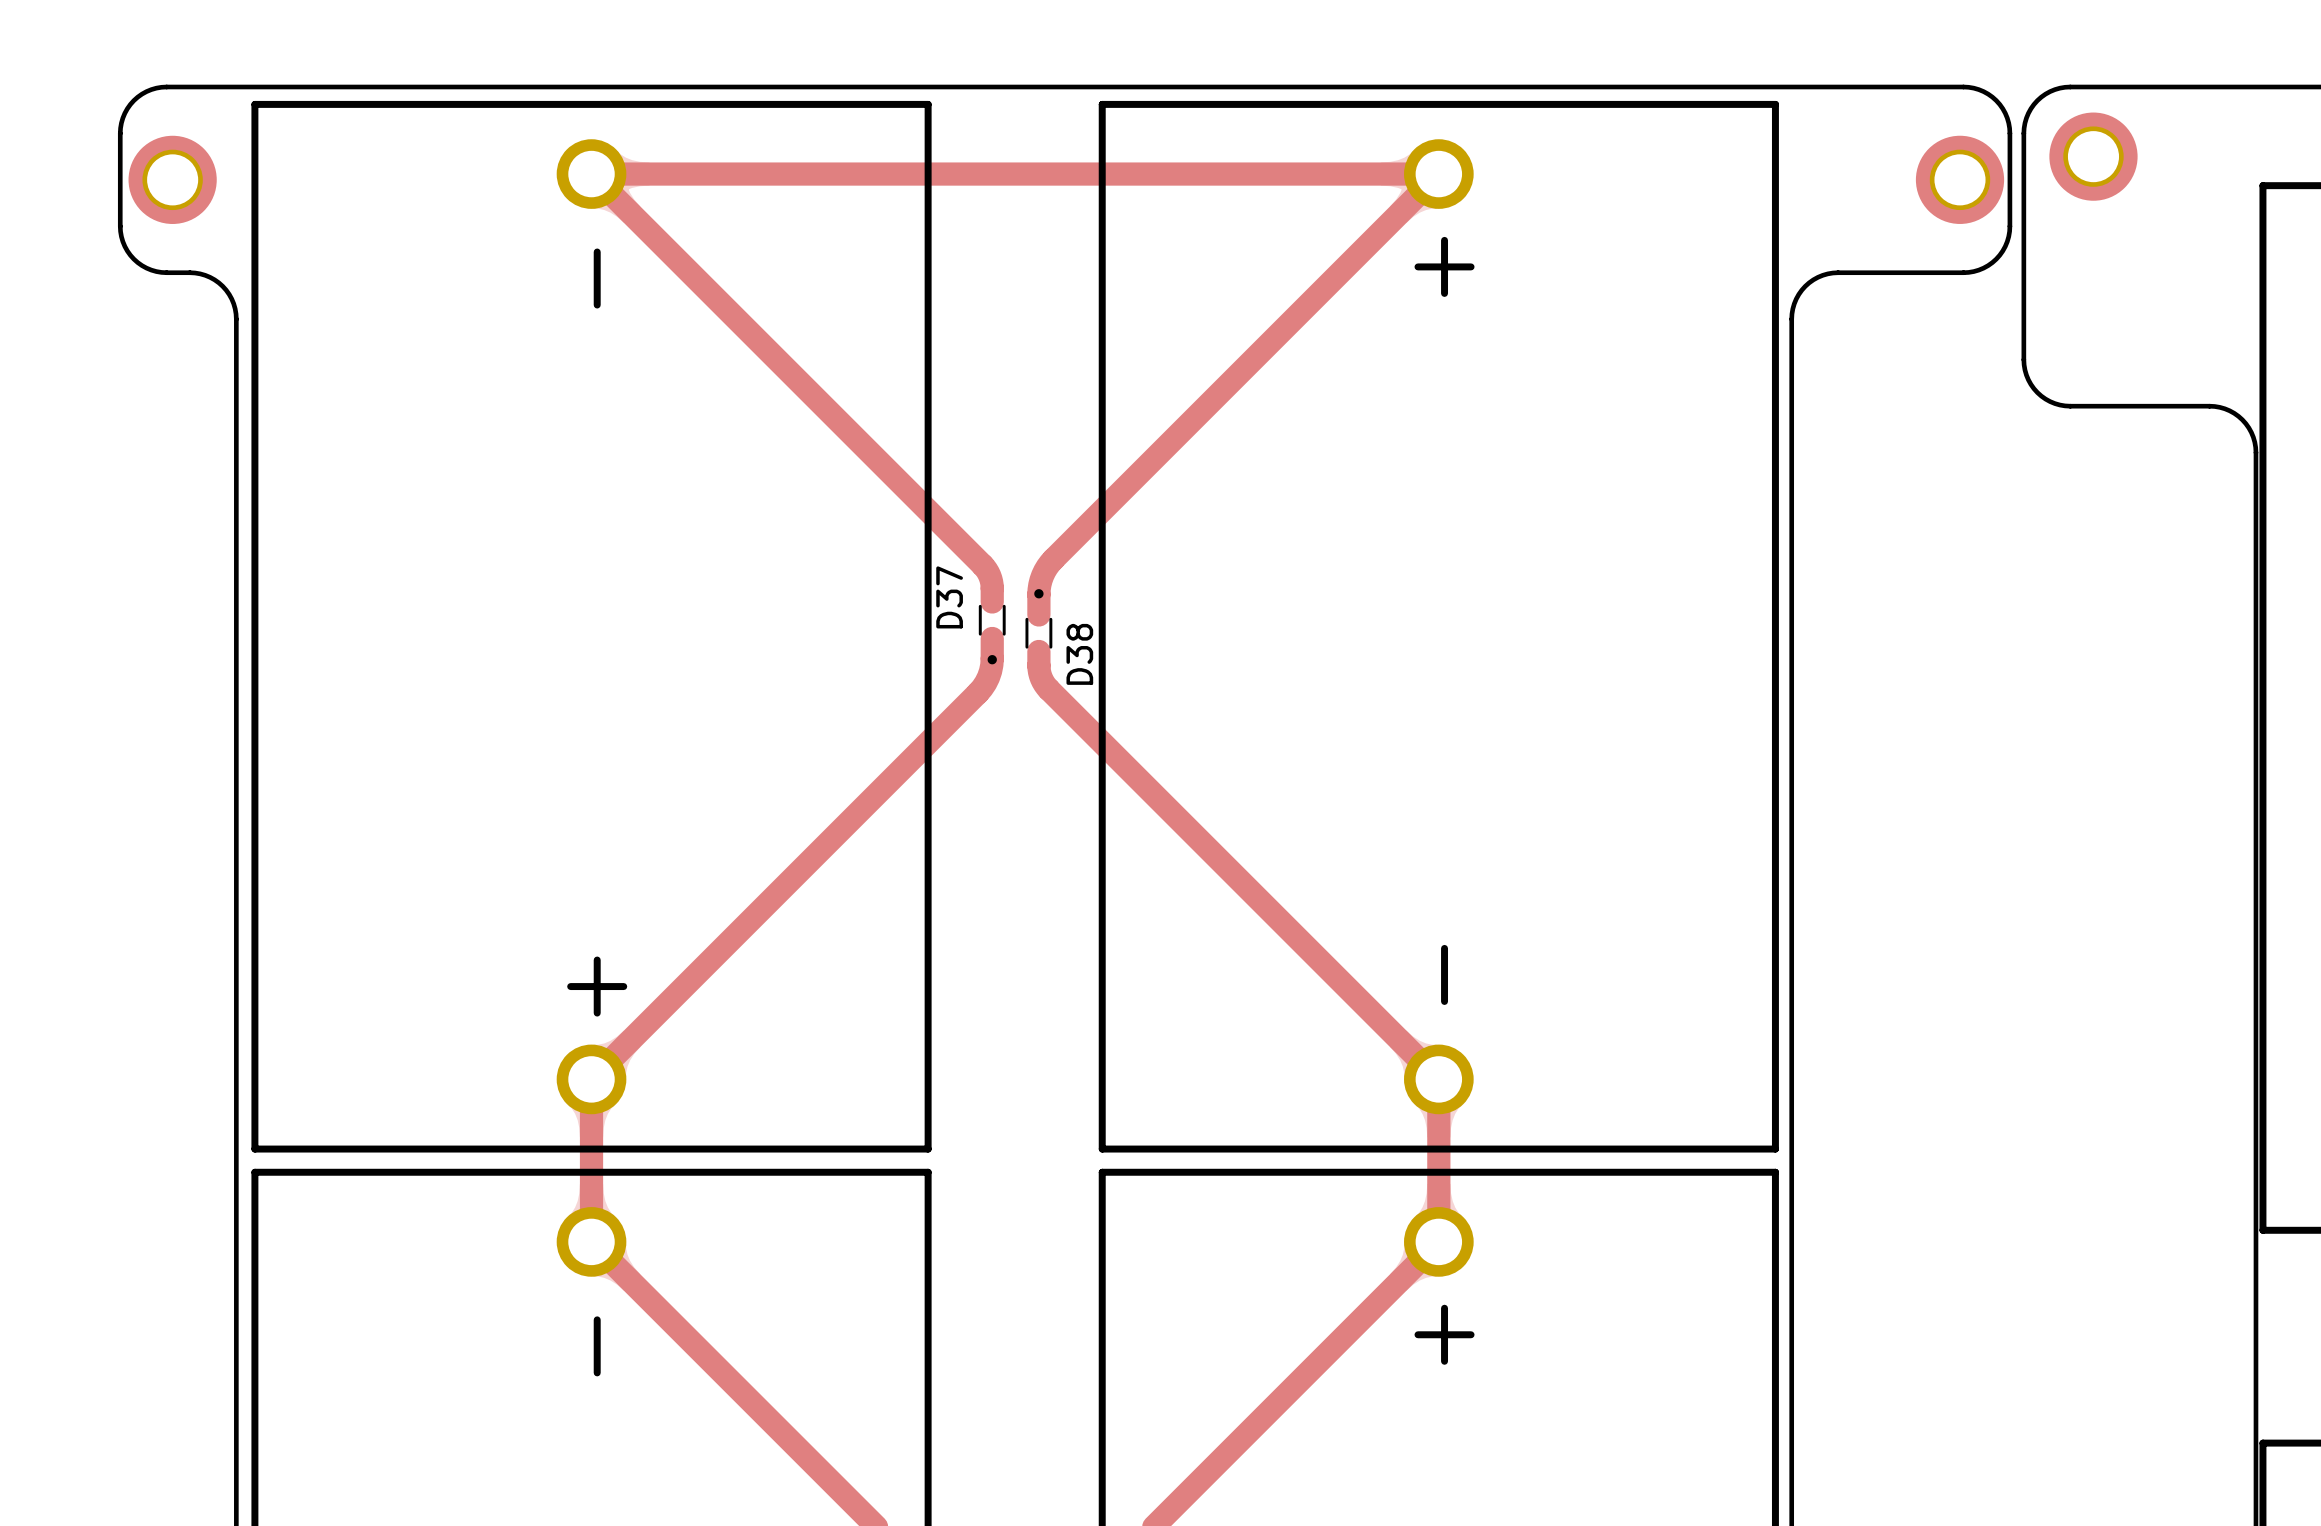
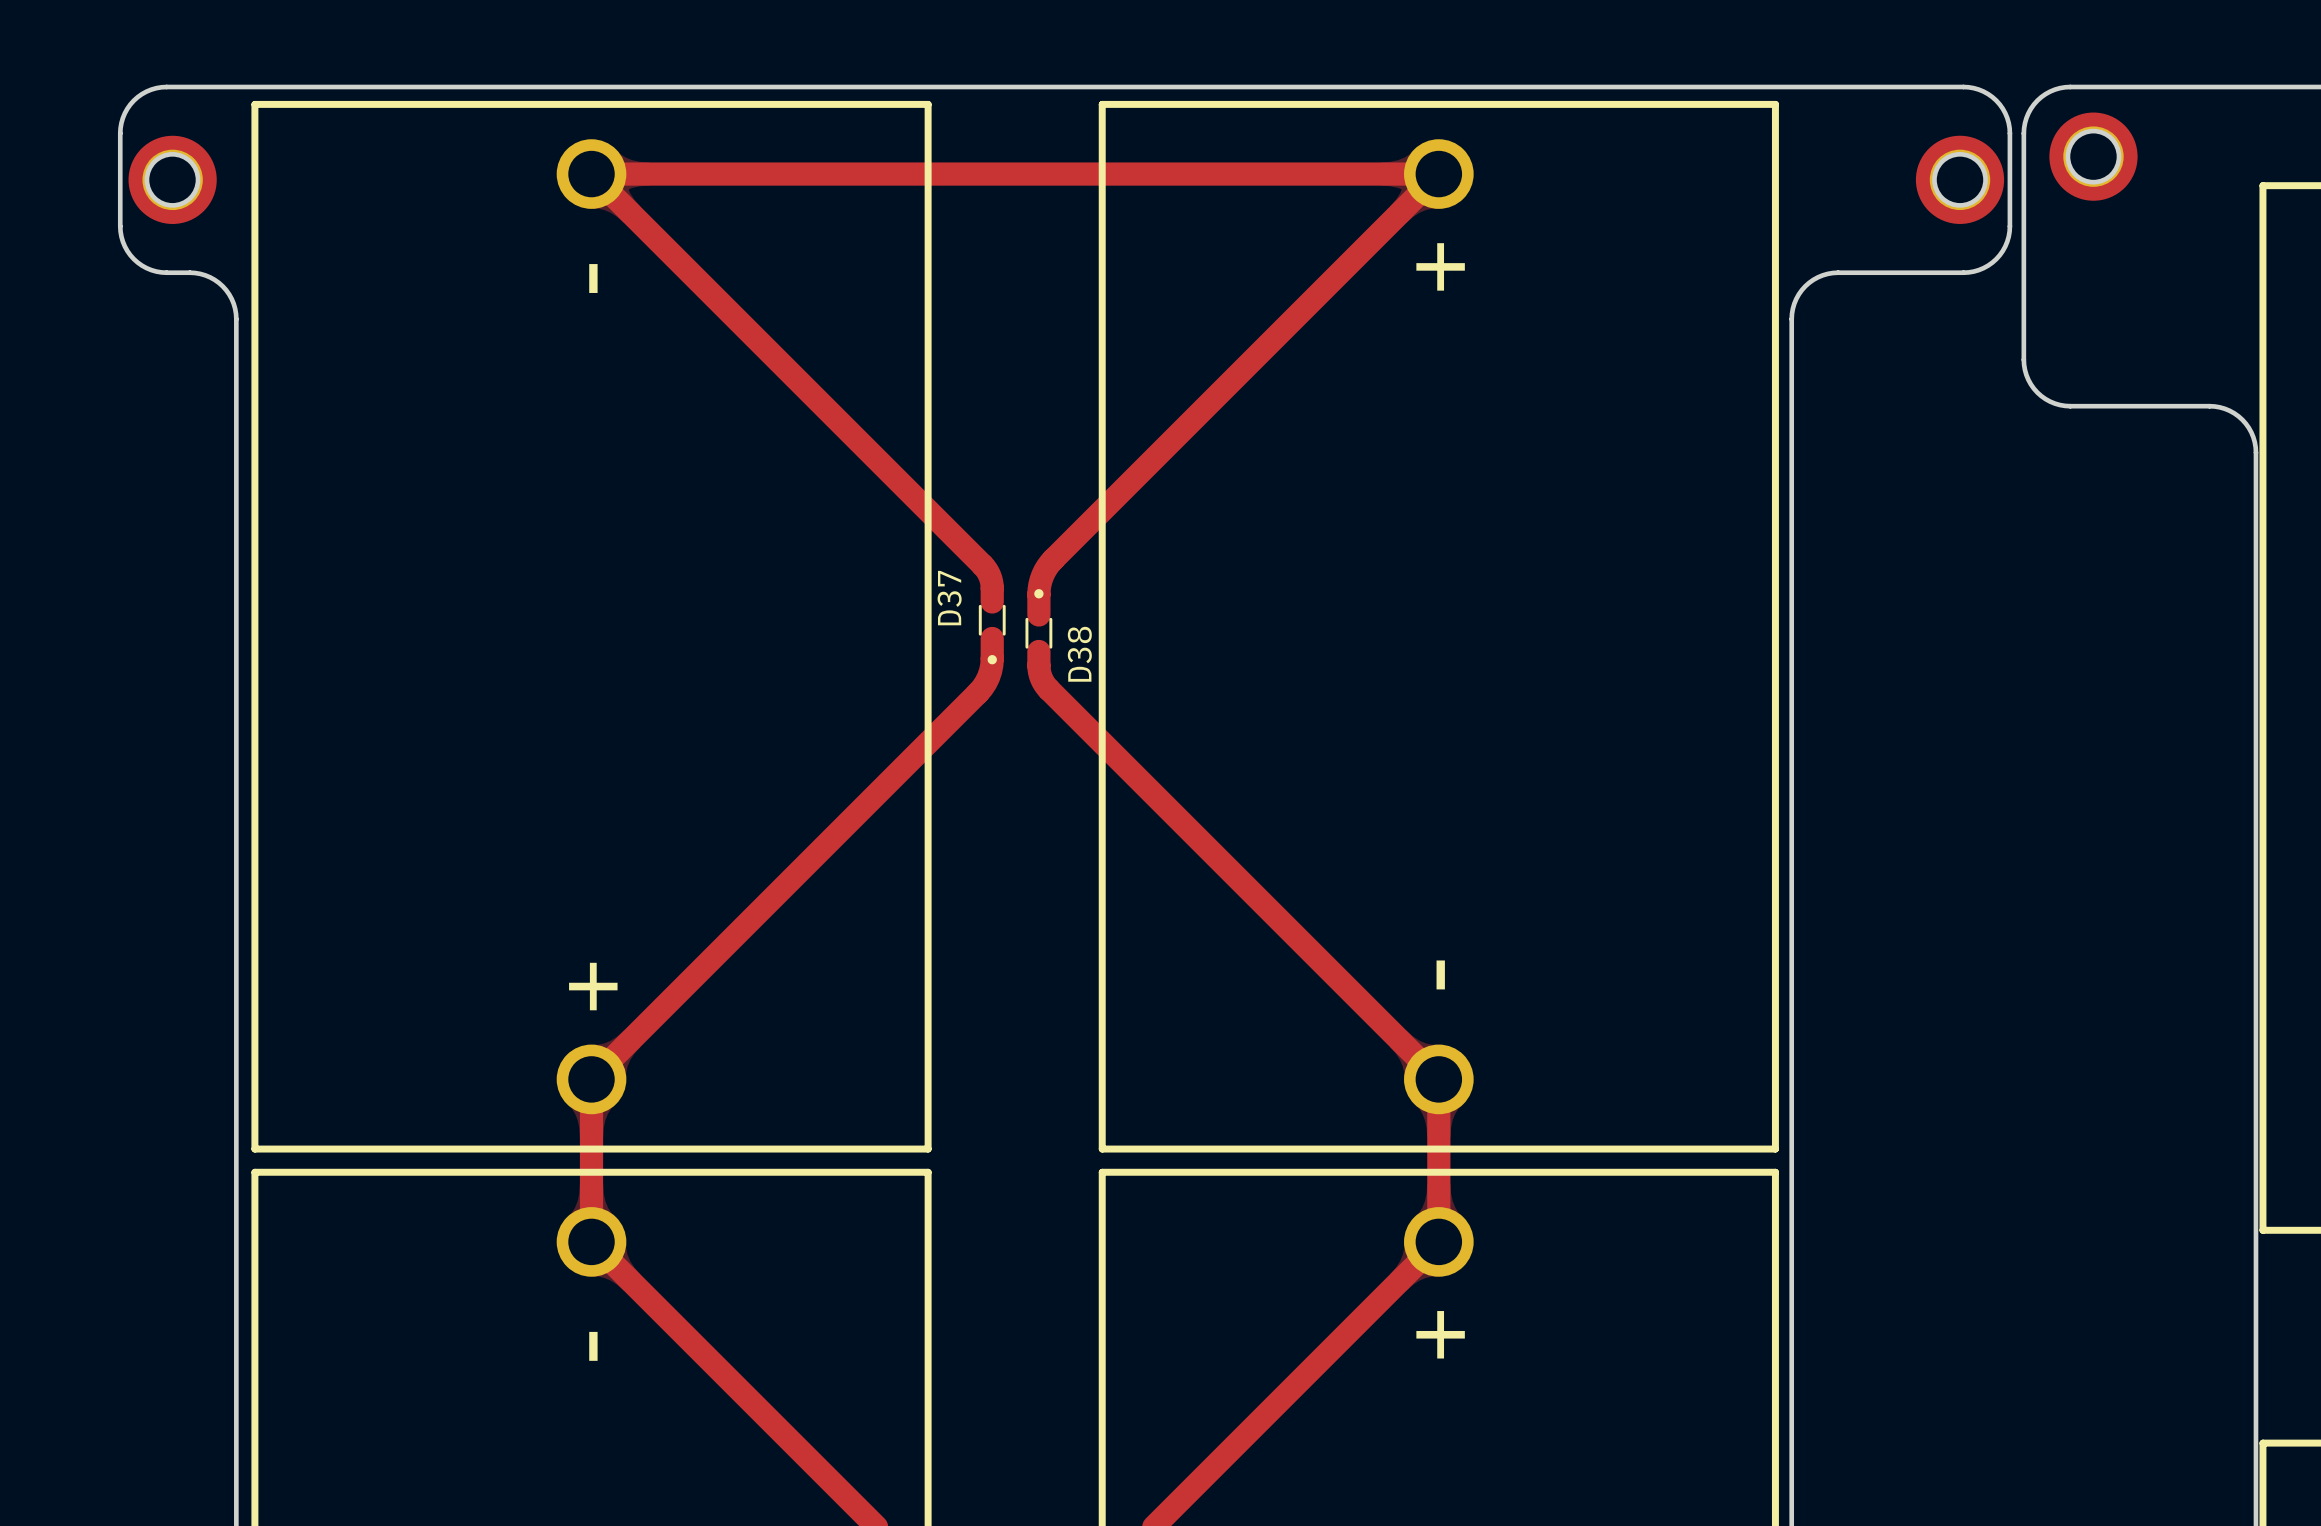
round board edge: none -> [2065, 128, 2122, 185]
round board edge: none -> [144, 151, 201, 208]
round board edge: none -> [1932, 151, 1988, 208]

